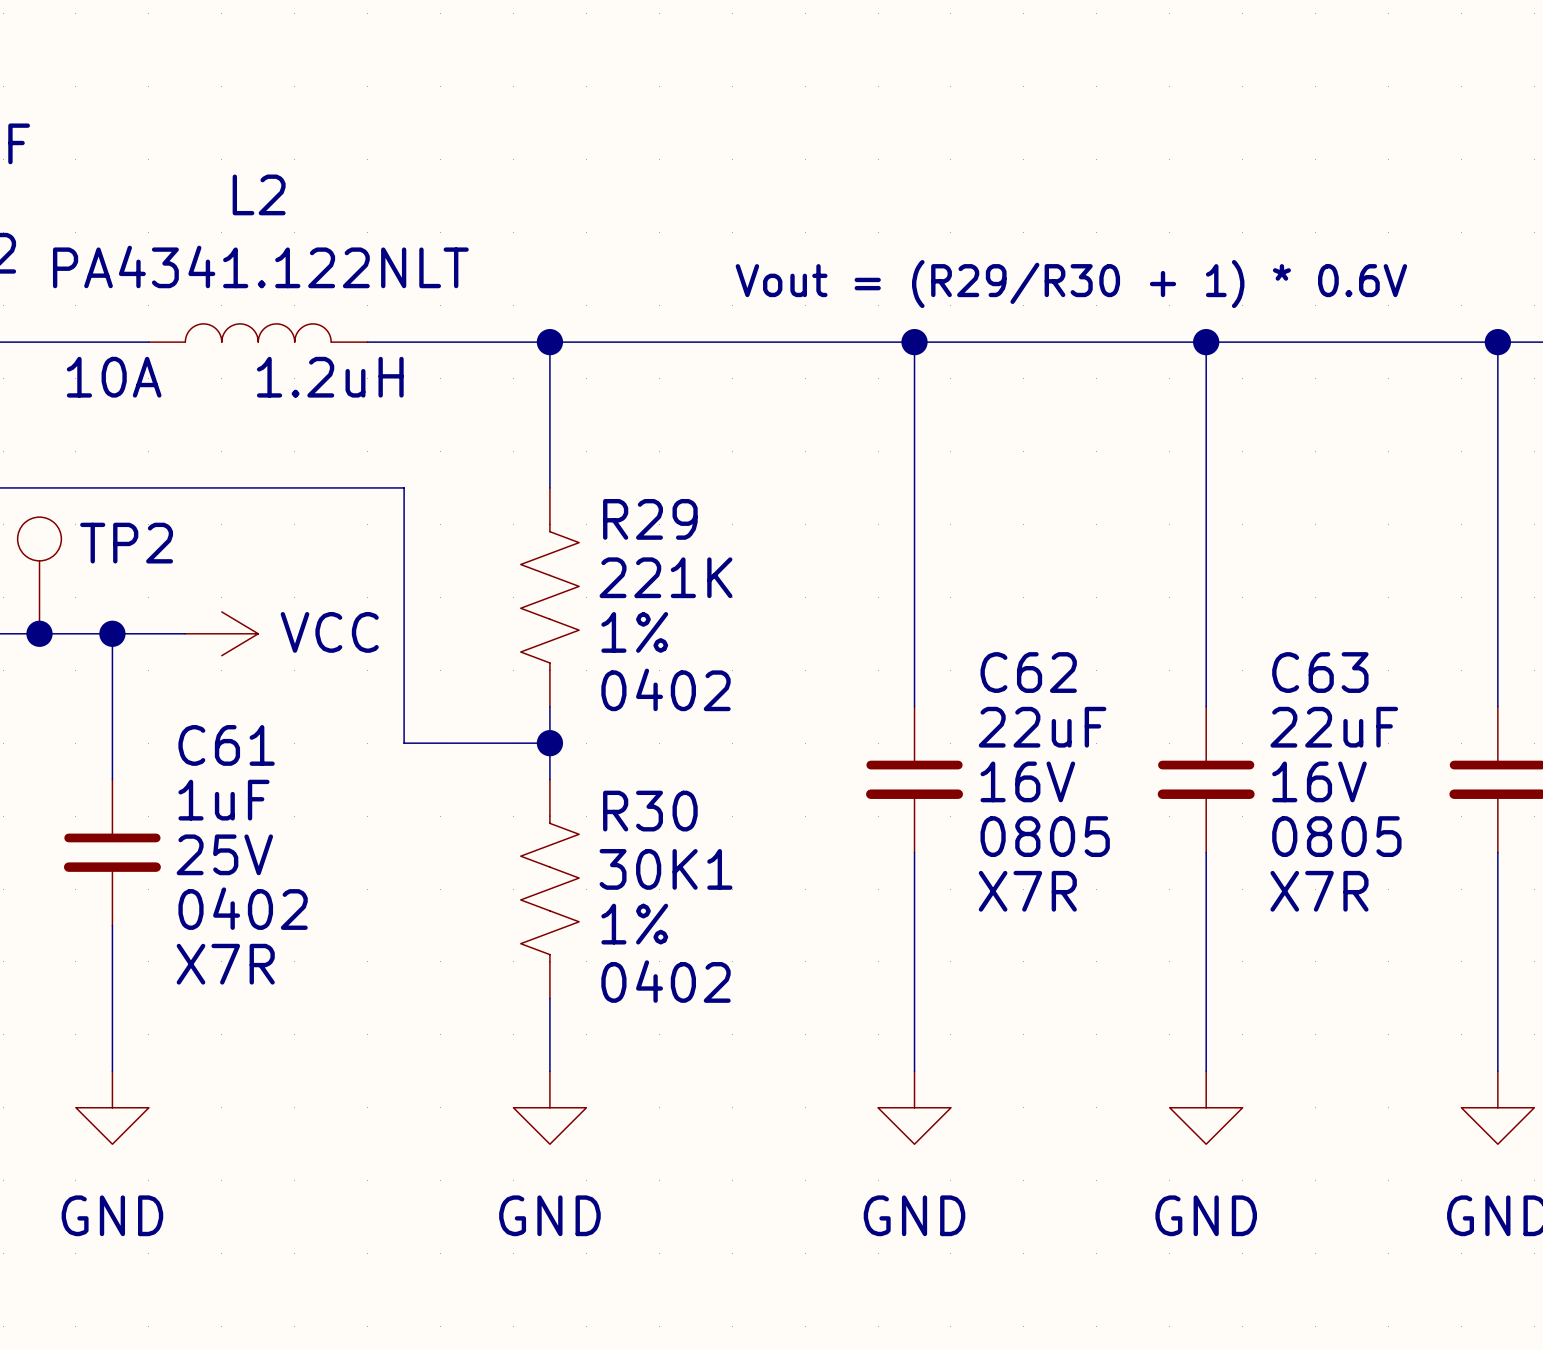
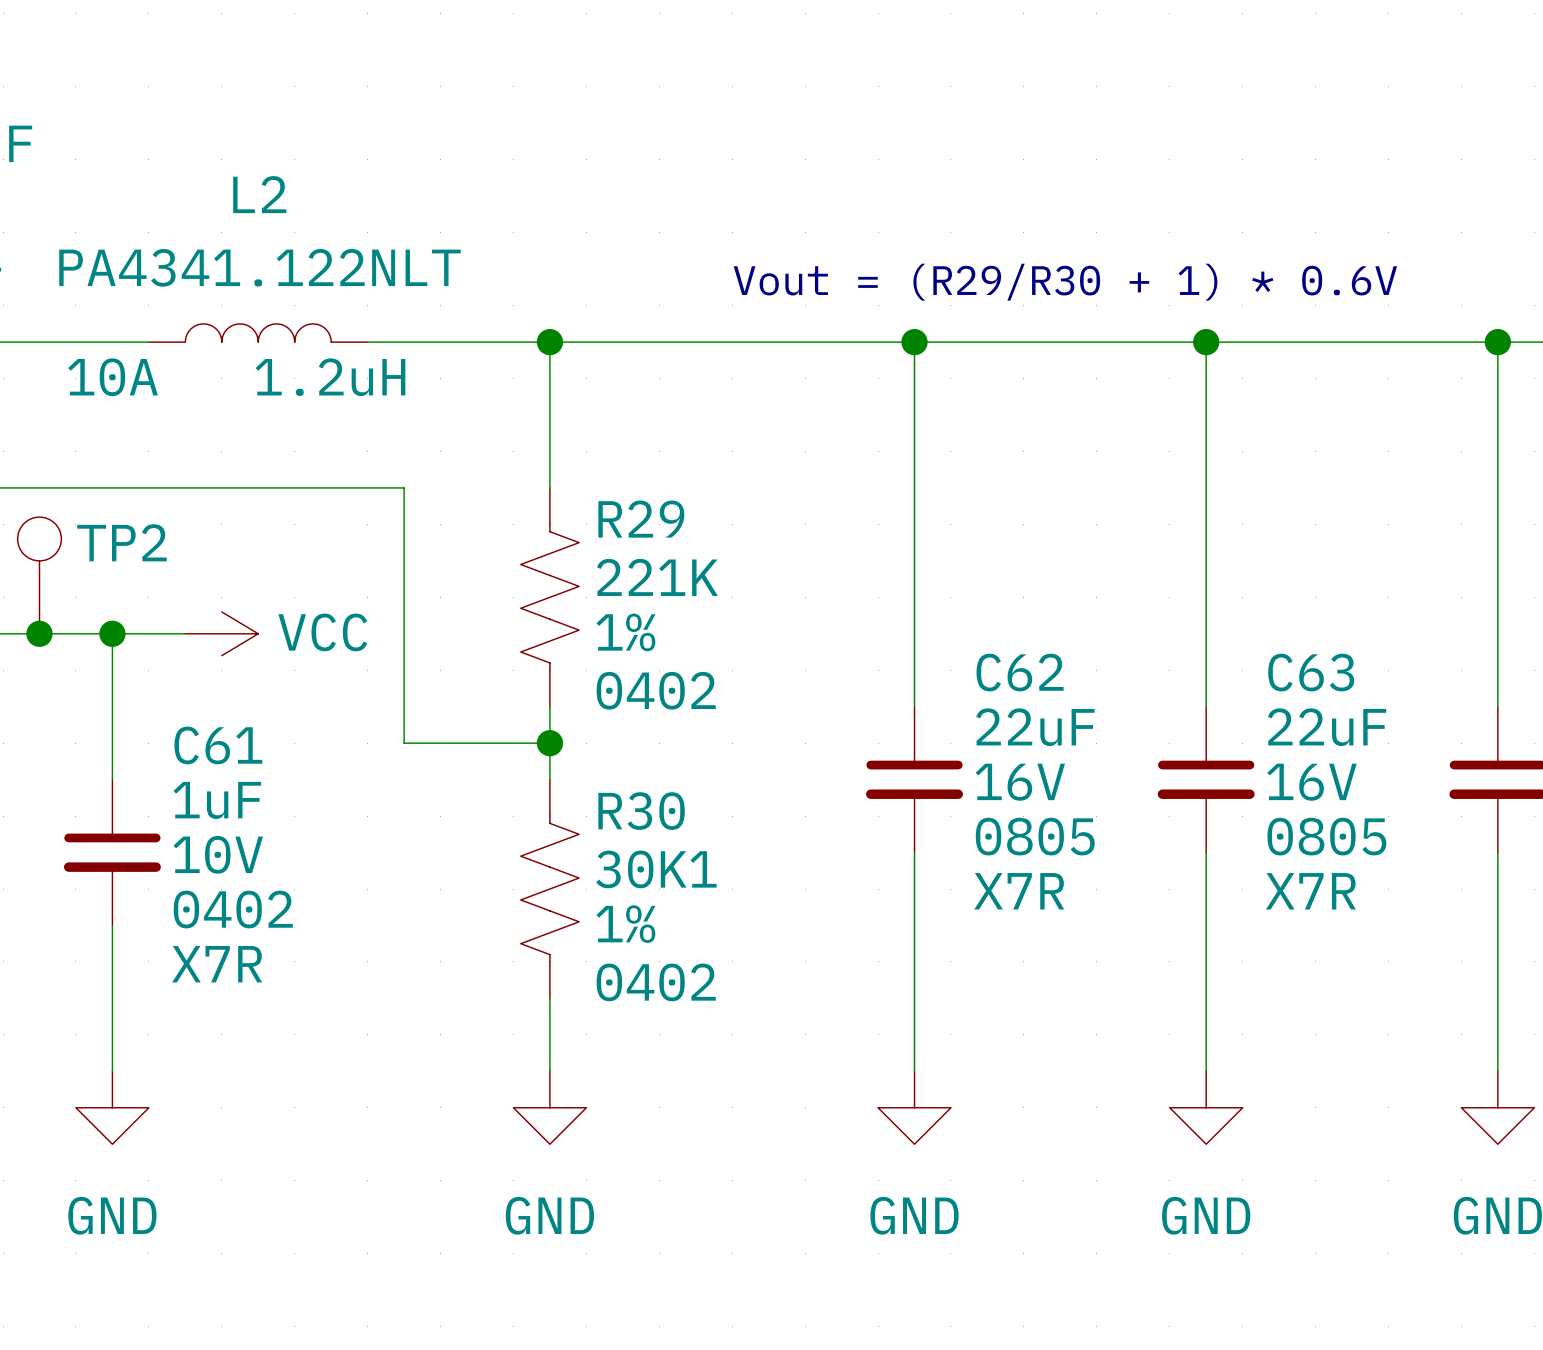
C61 text: 25V (224, 854) -> 10V (218, 854)

